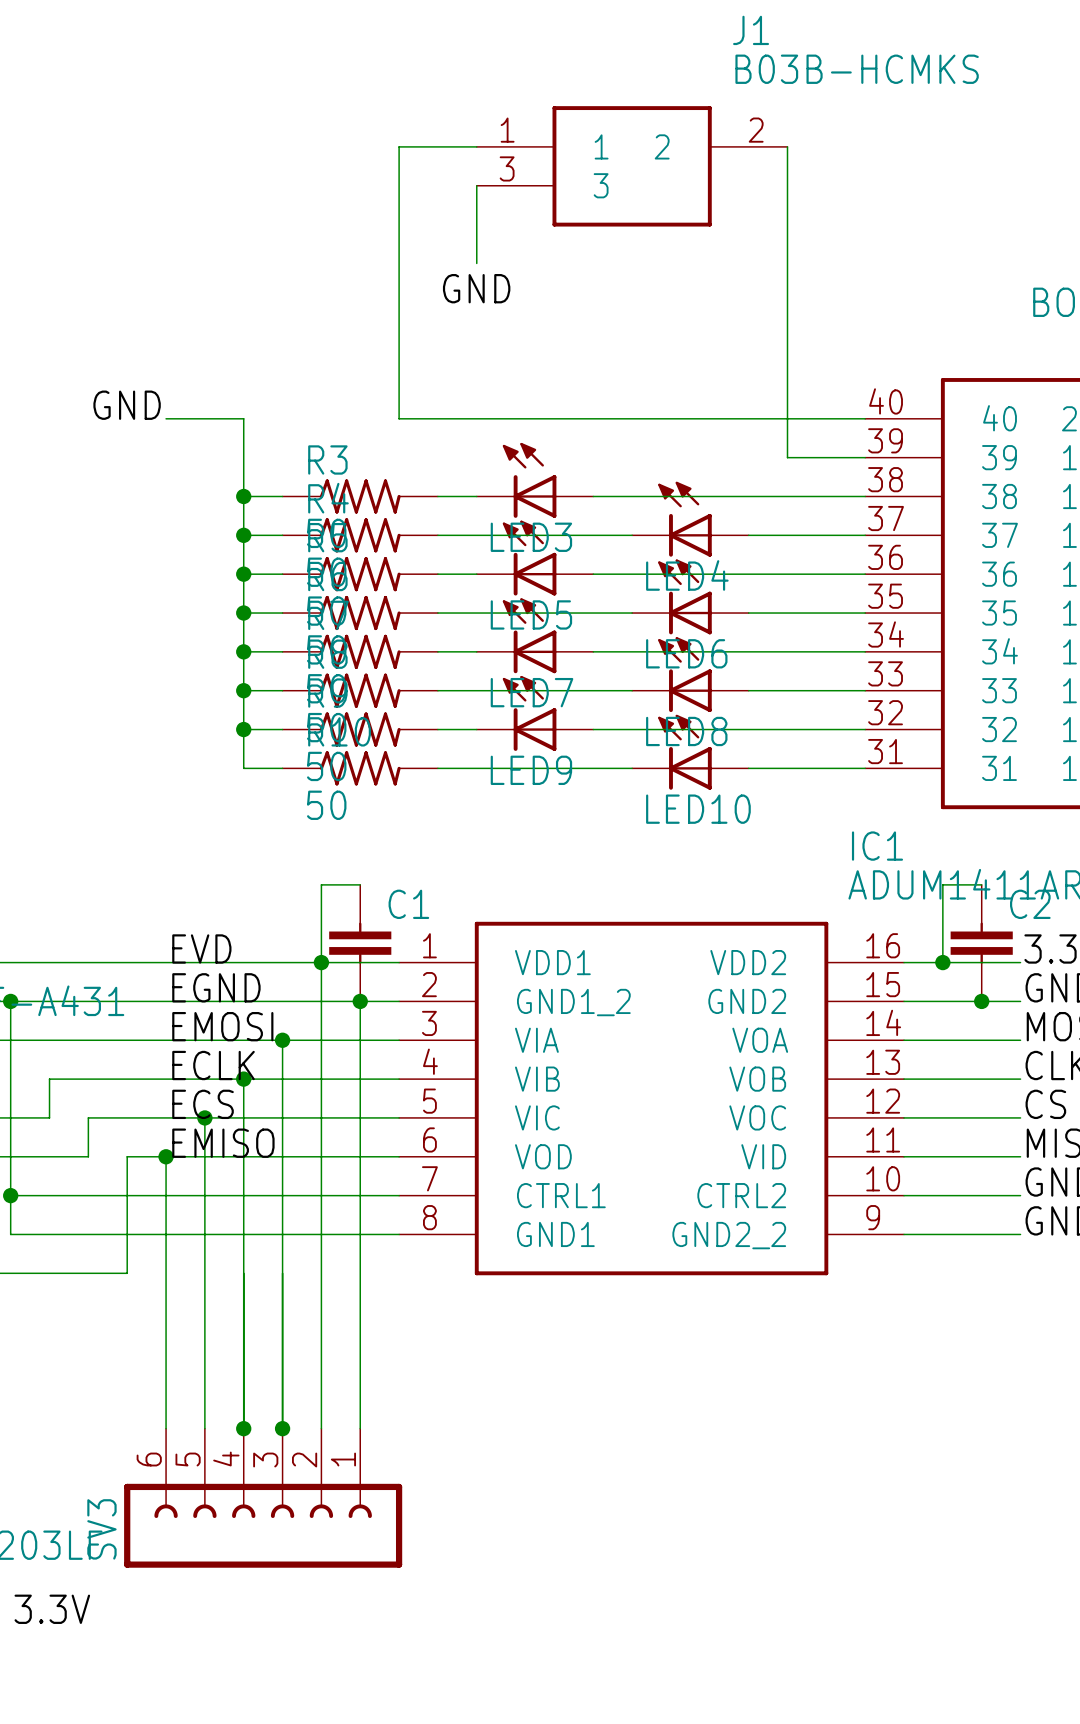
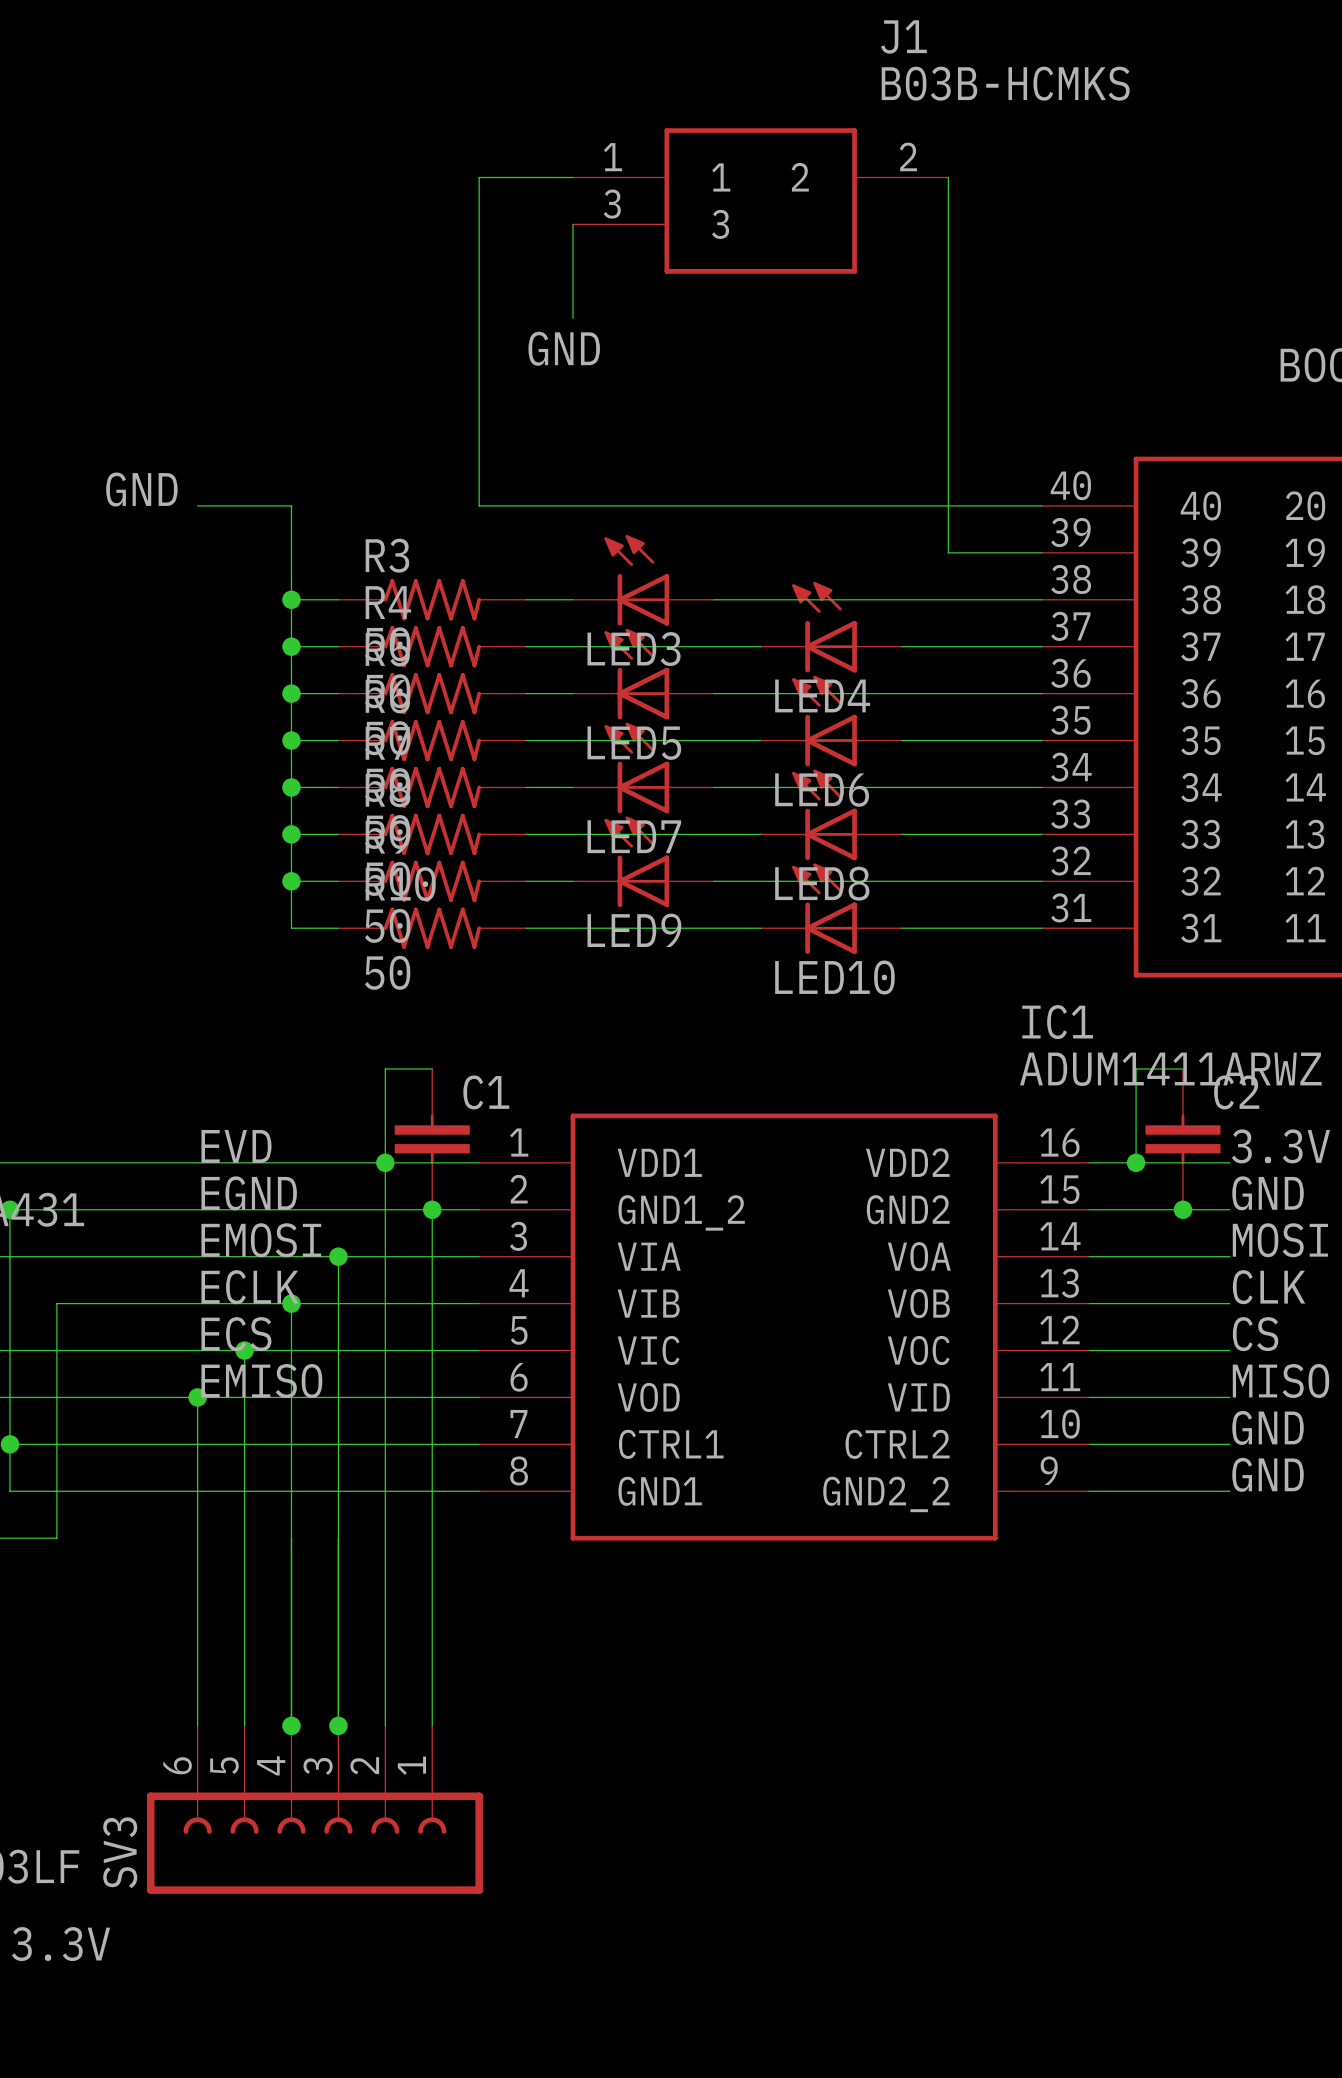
wire: (88, 1117) (88, 1156) -> (150, 1397) (103, 1397)
wire: (127, 1156) (127, 1273) (49, 1273) -> (103, 1350) (56, 1350) (56, 1538)

